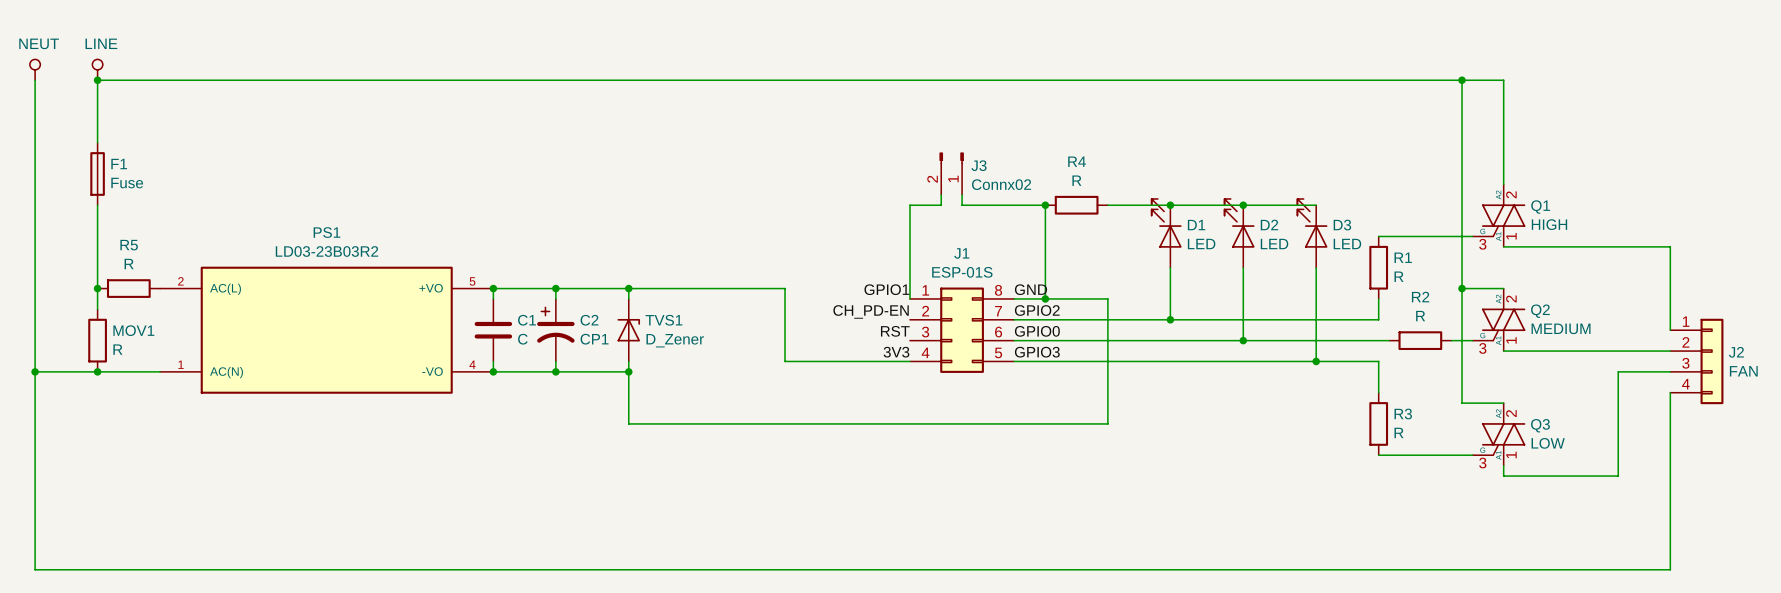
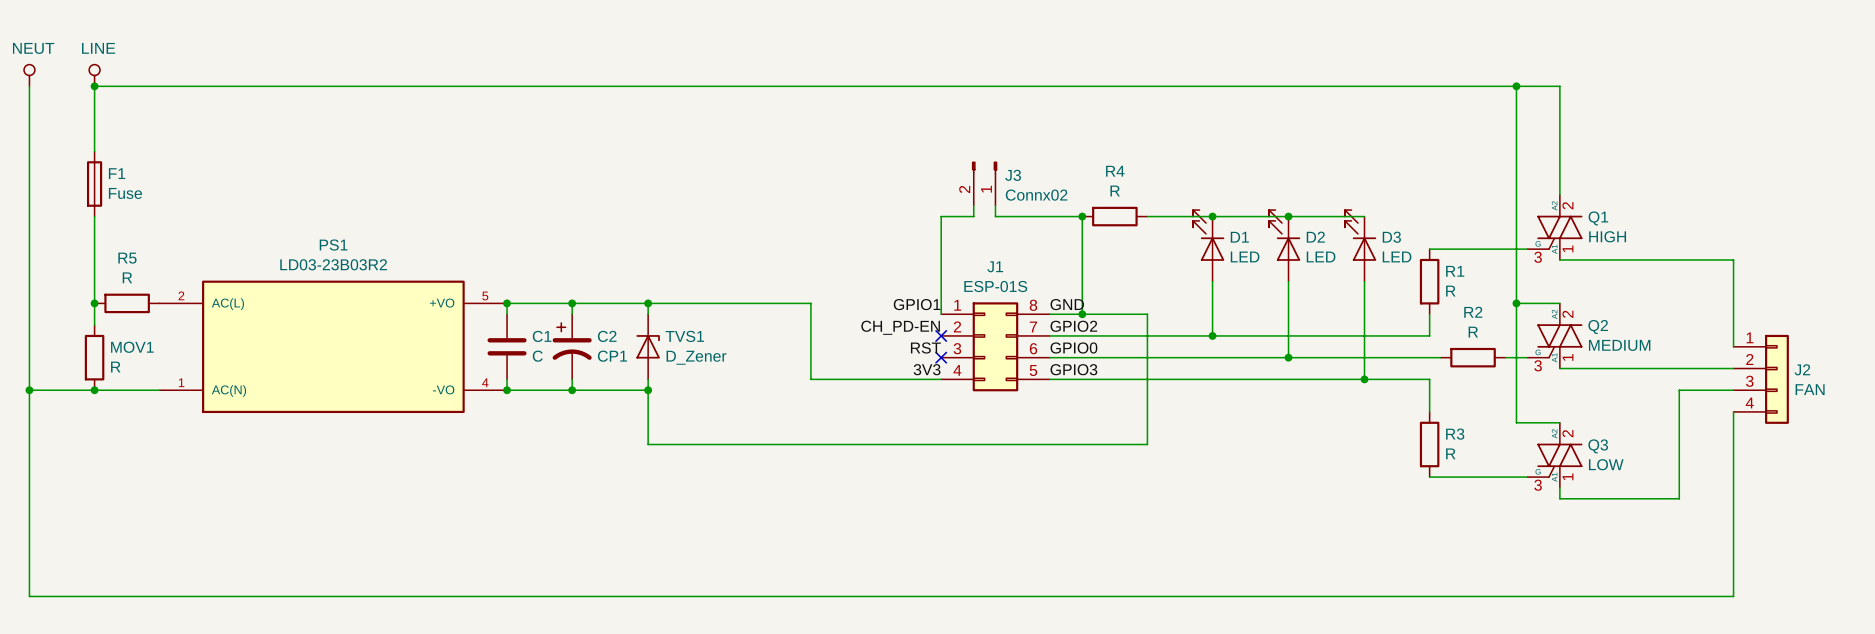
no-connect mark: none -> (941, 335)
no-connect mark: none -> (941, 357)

